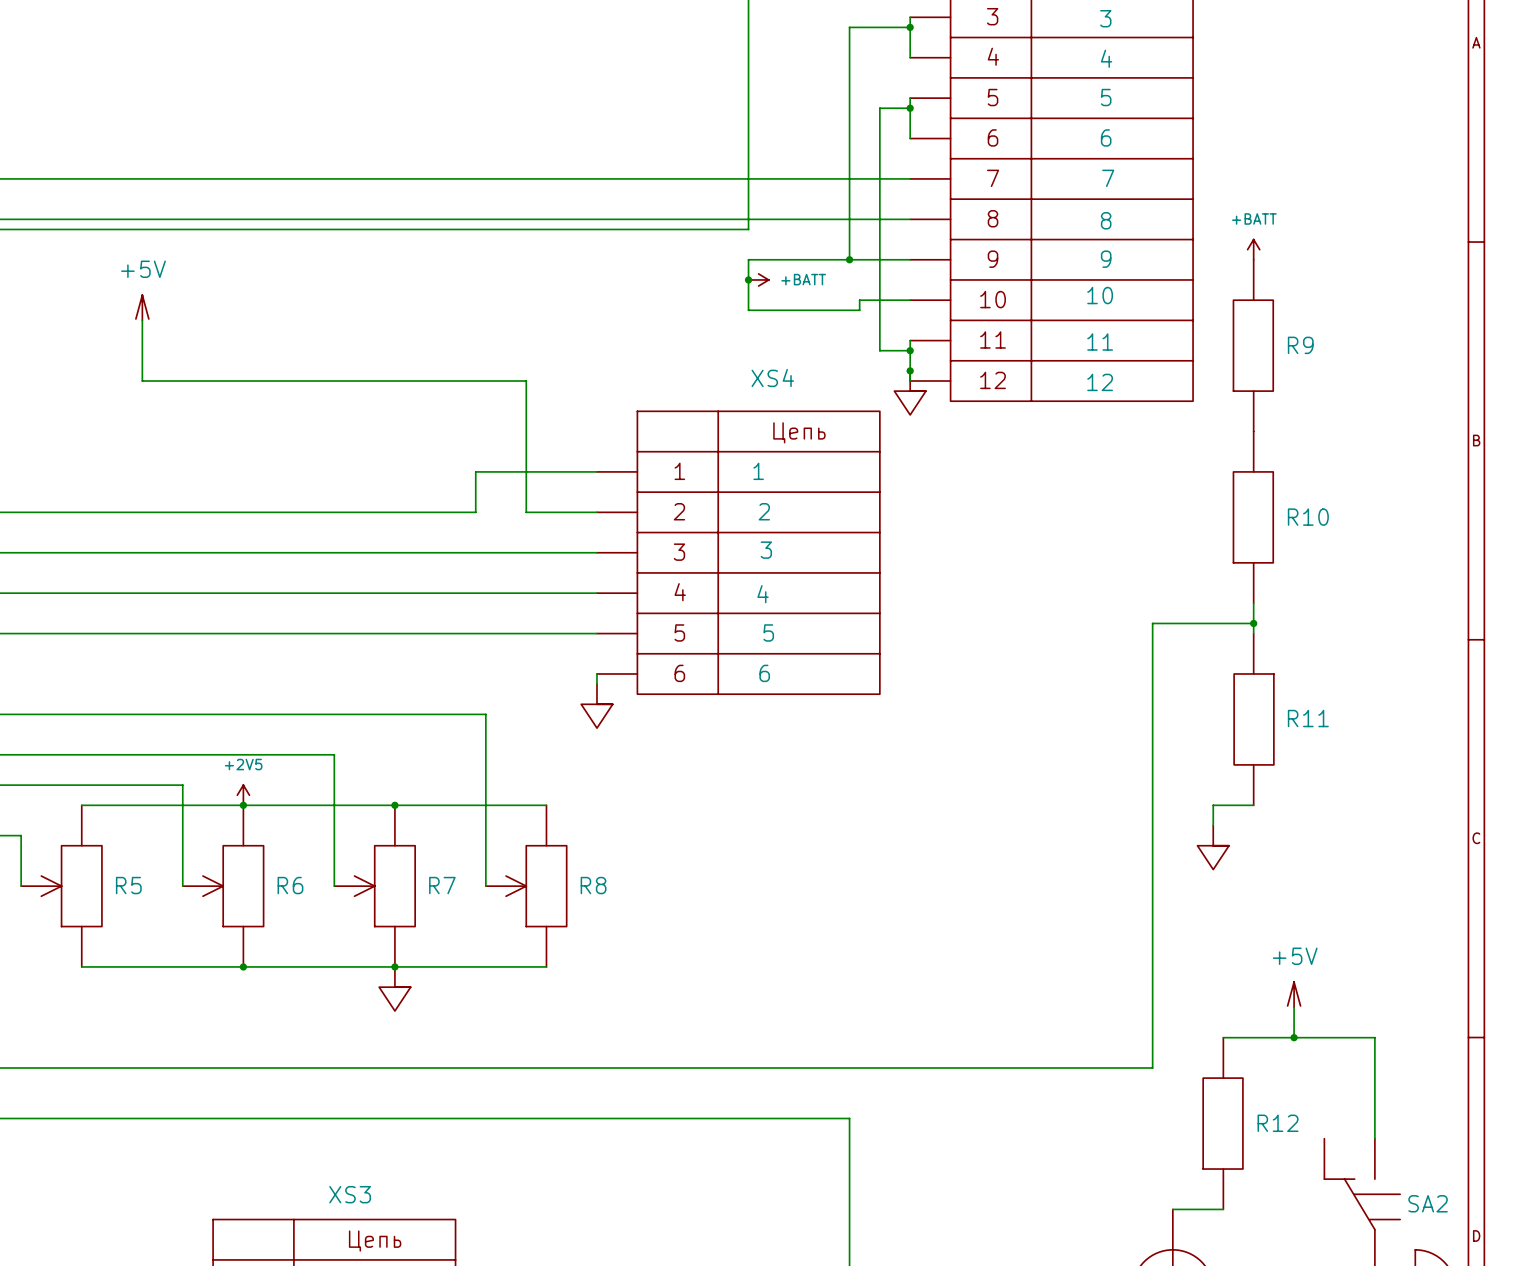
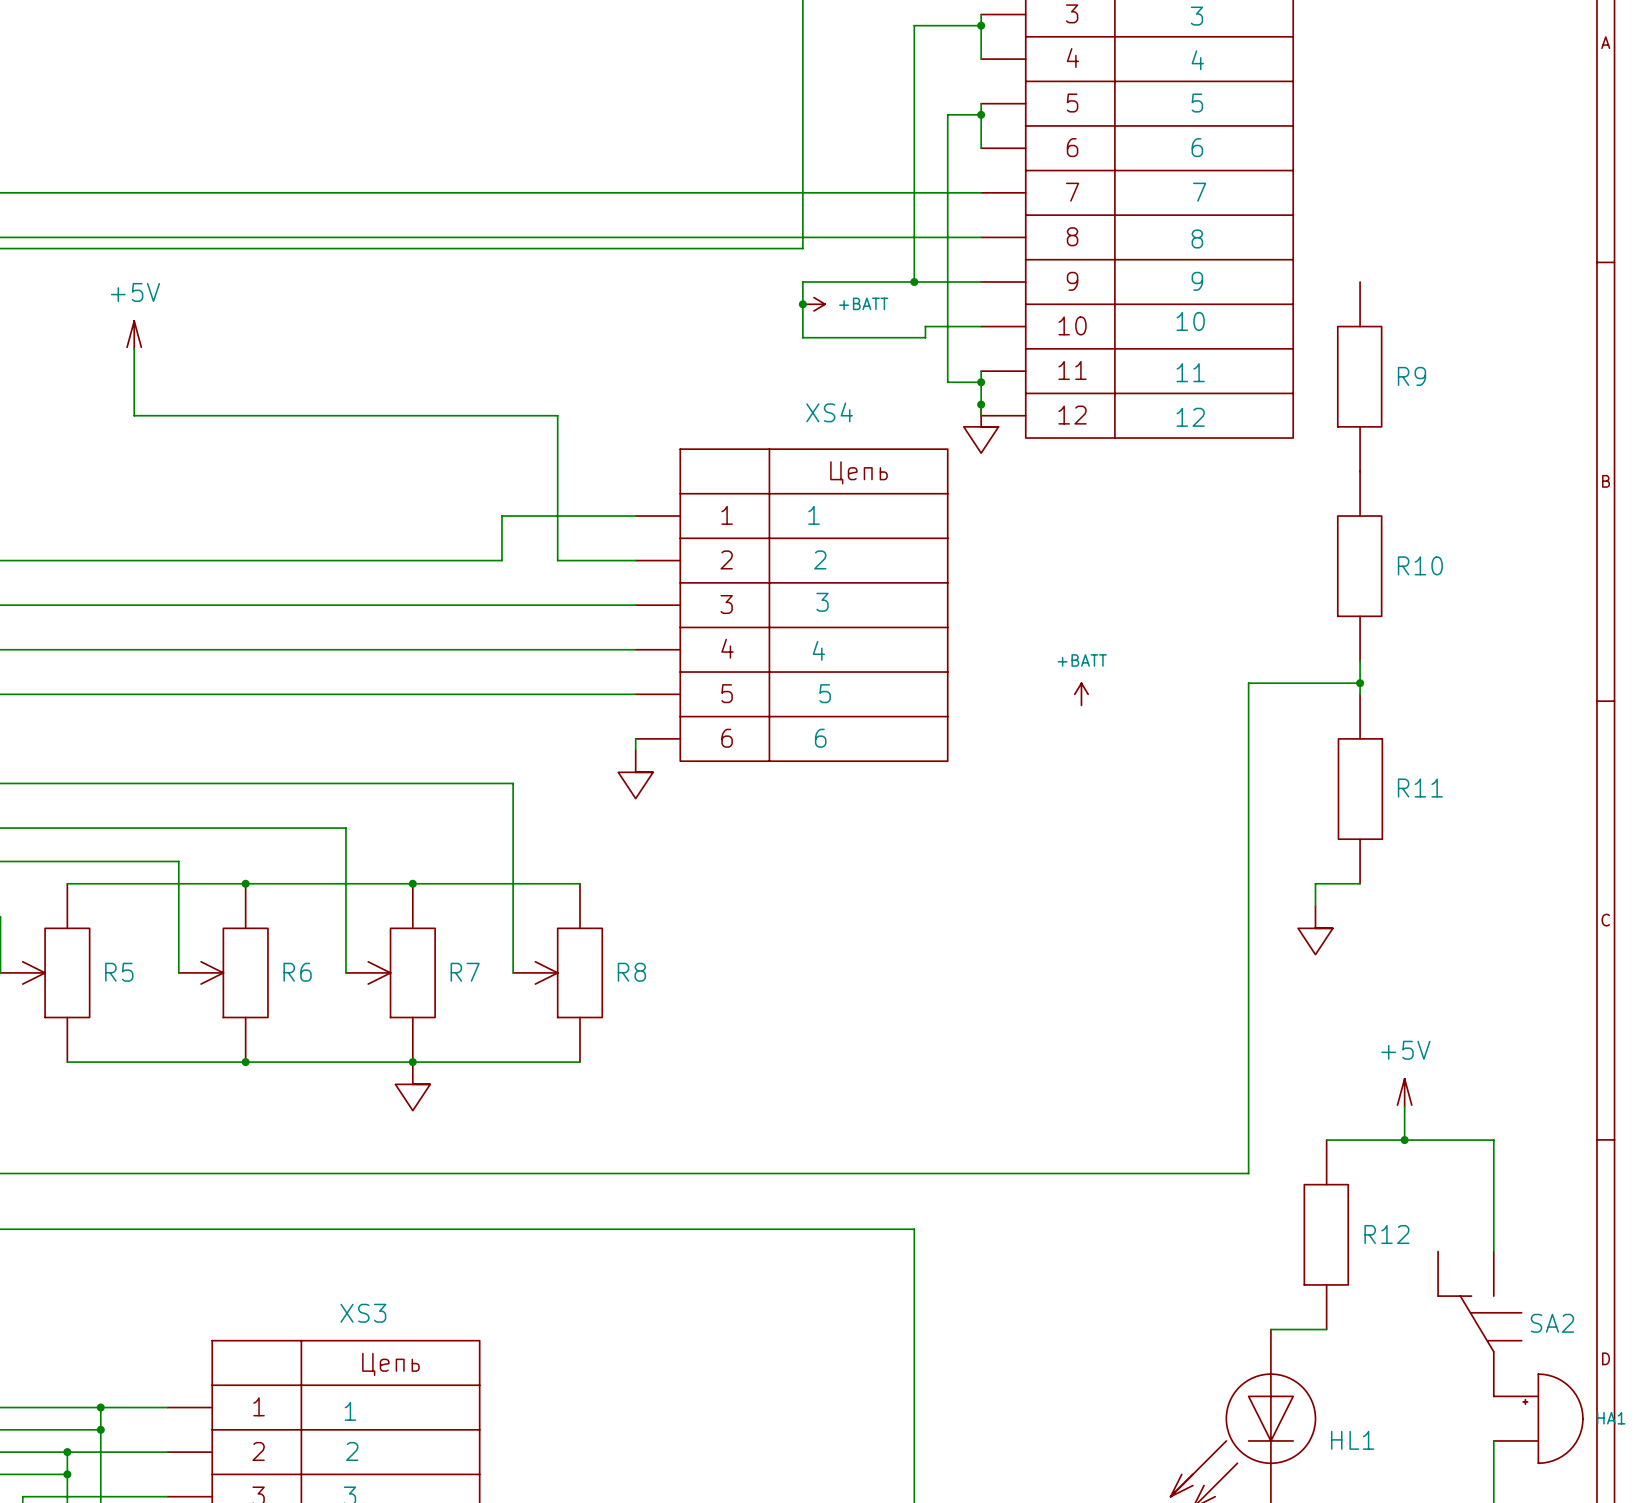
power symbol: +BATT (1253, 249) -> none
power symbol: none -> +BATT (1081, 694)
power symbol: +2V5 (243, 795) -> none

